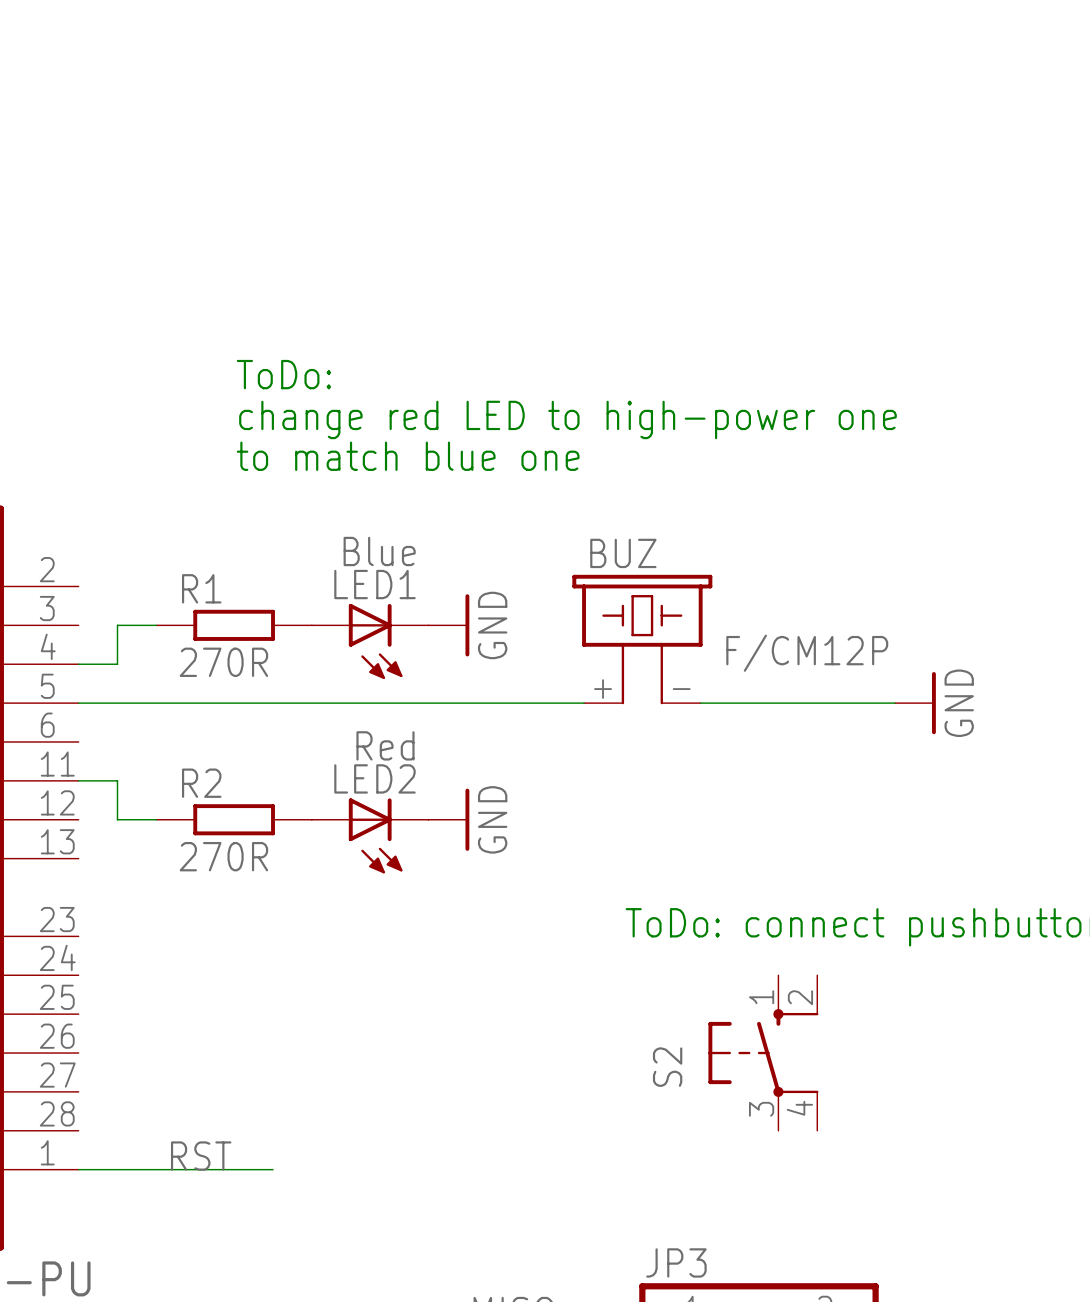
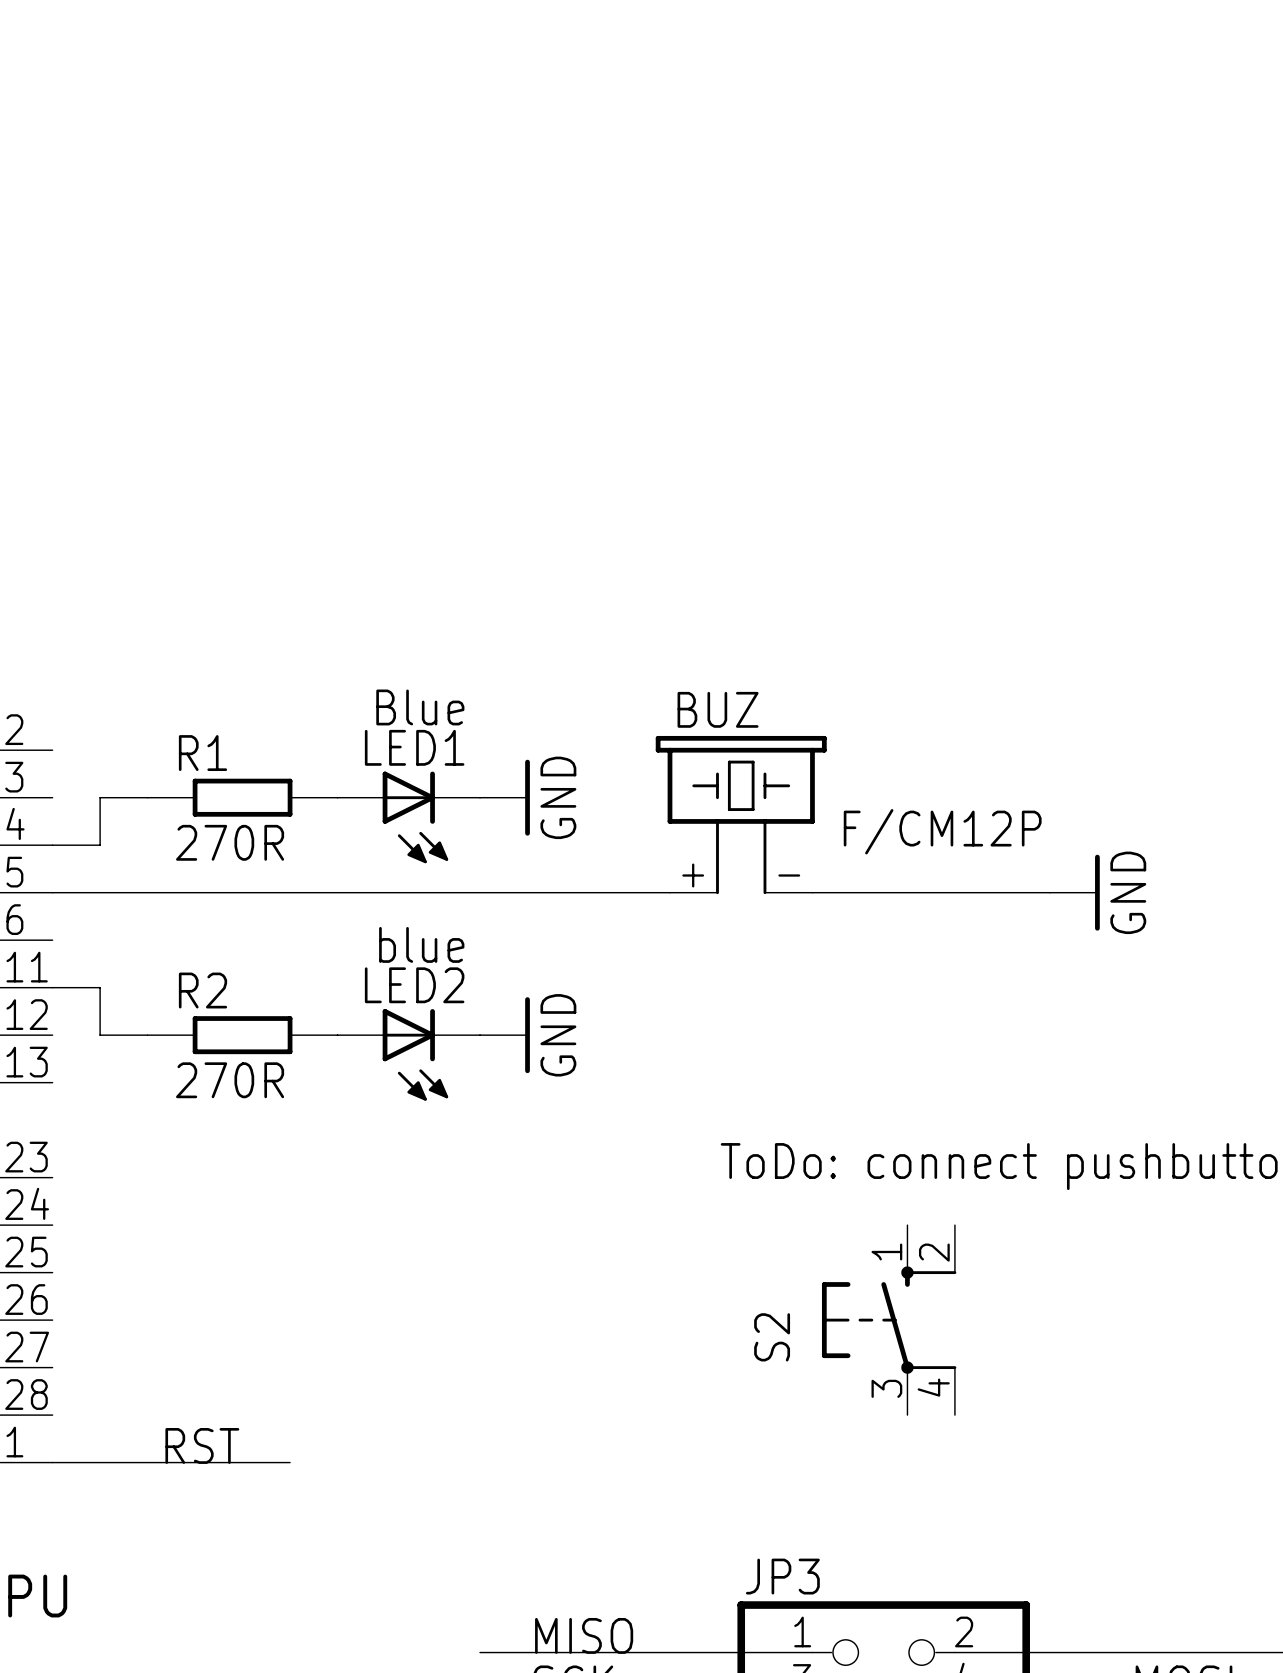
text: ToDo: (283, 374) -> none
text: change red LED to high-power one (567, 419) -> none
text: to match blue one (408, 456) -> none
LED2 value: Red (385, 745) -> blue (421, 944)

